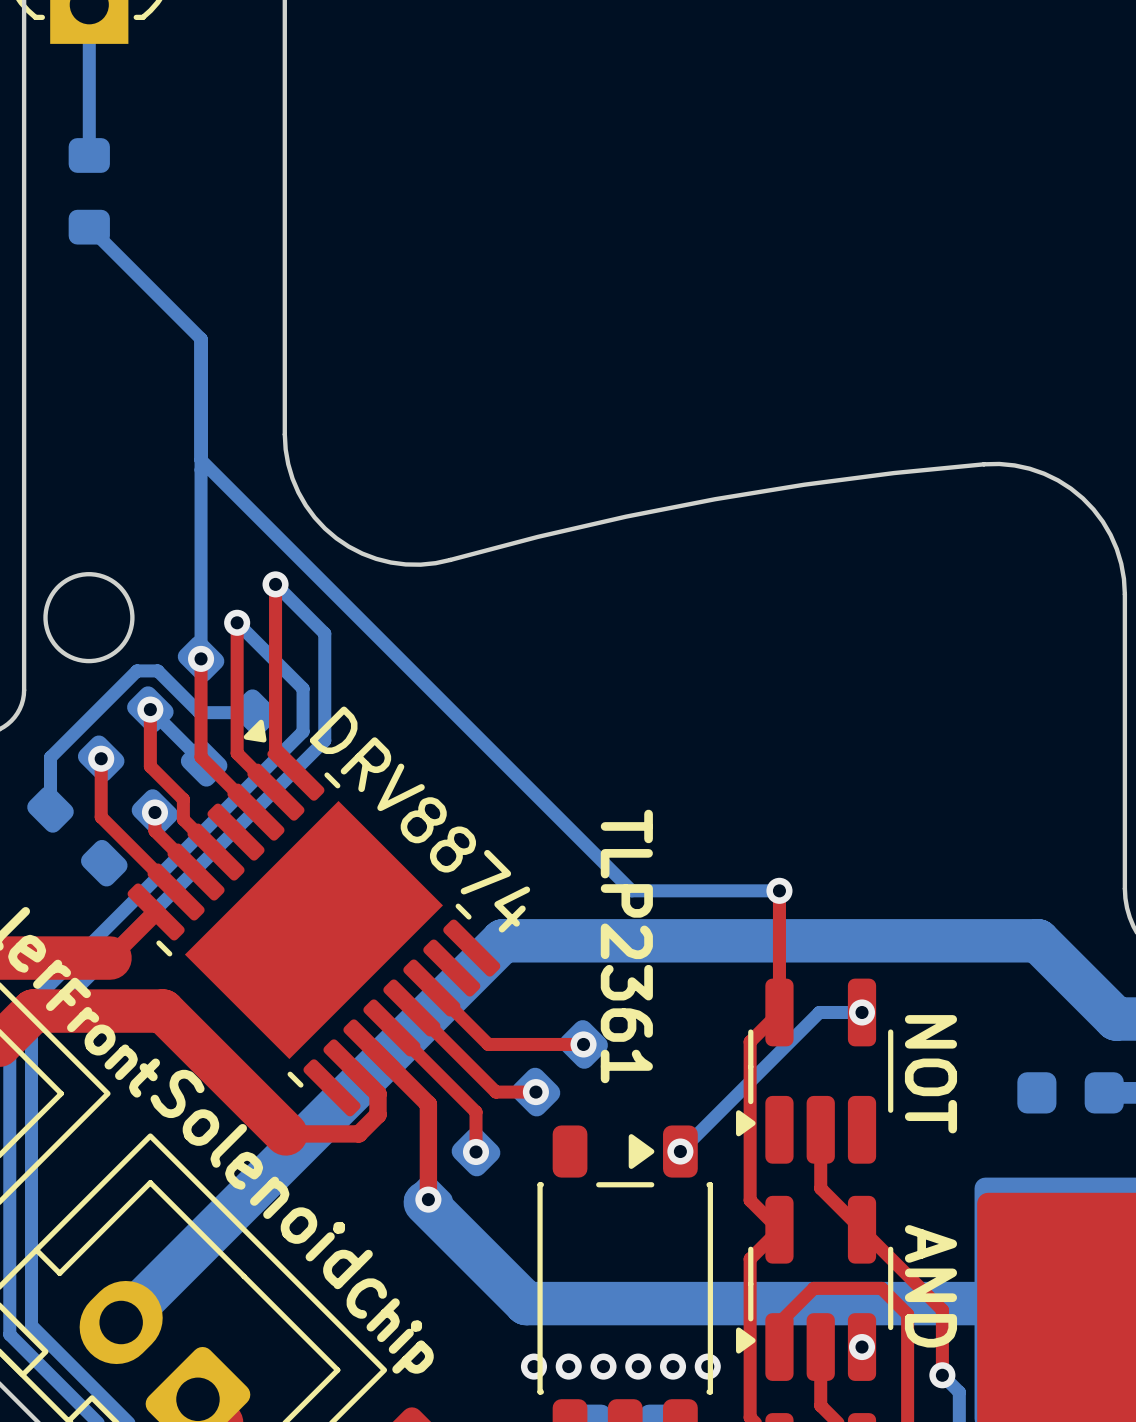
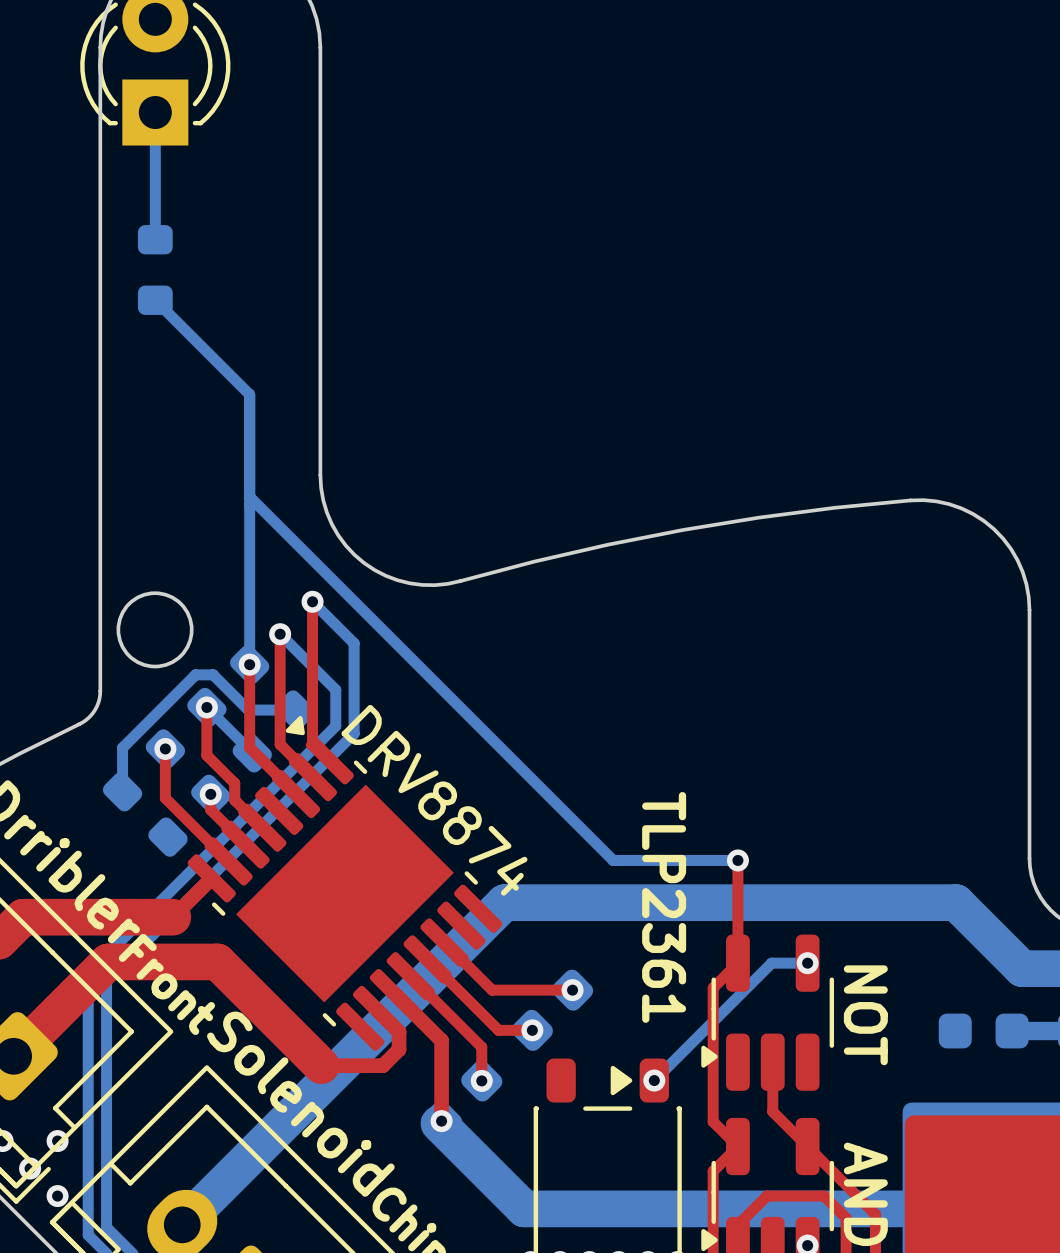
part value position: TLP2361 (626, 946) -> TLP2361 (664, 907)

